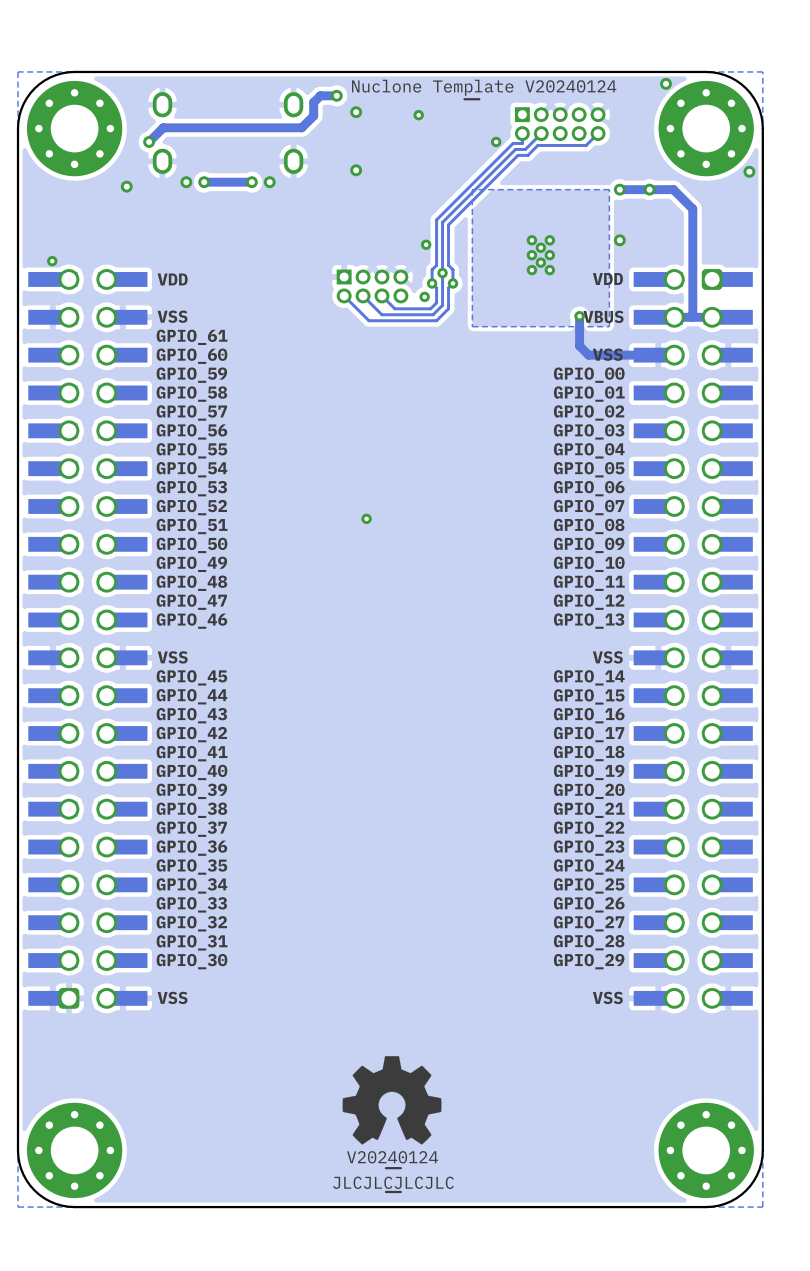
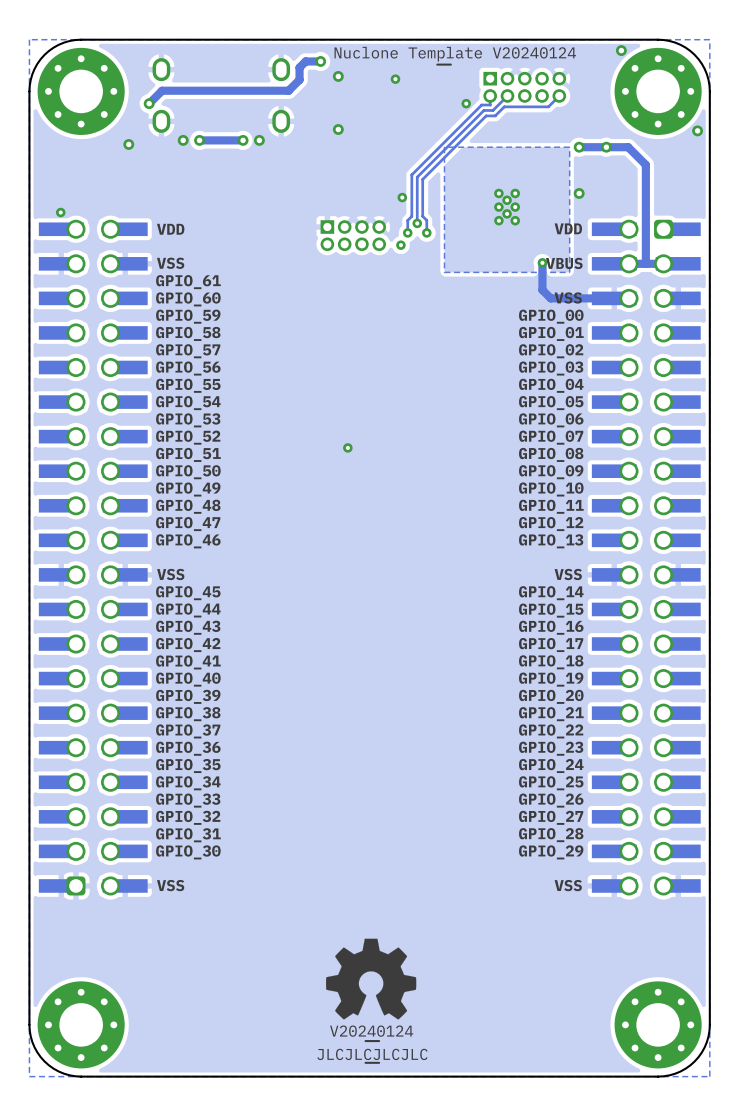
track: (442, 273) (442, 305) (433, 314) (381, 314) (363, 295) -> none
track: (432, 283) (436, 287) (436, 302) (430, 308) (394, 308) (381, 295) -> none
track: (452, 283) (448, 287) (448, 308) (436, 320) (368, 320) (344, 295) -> none

